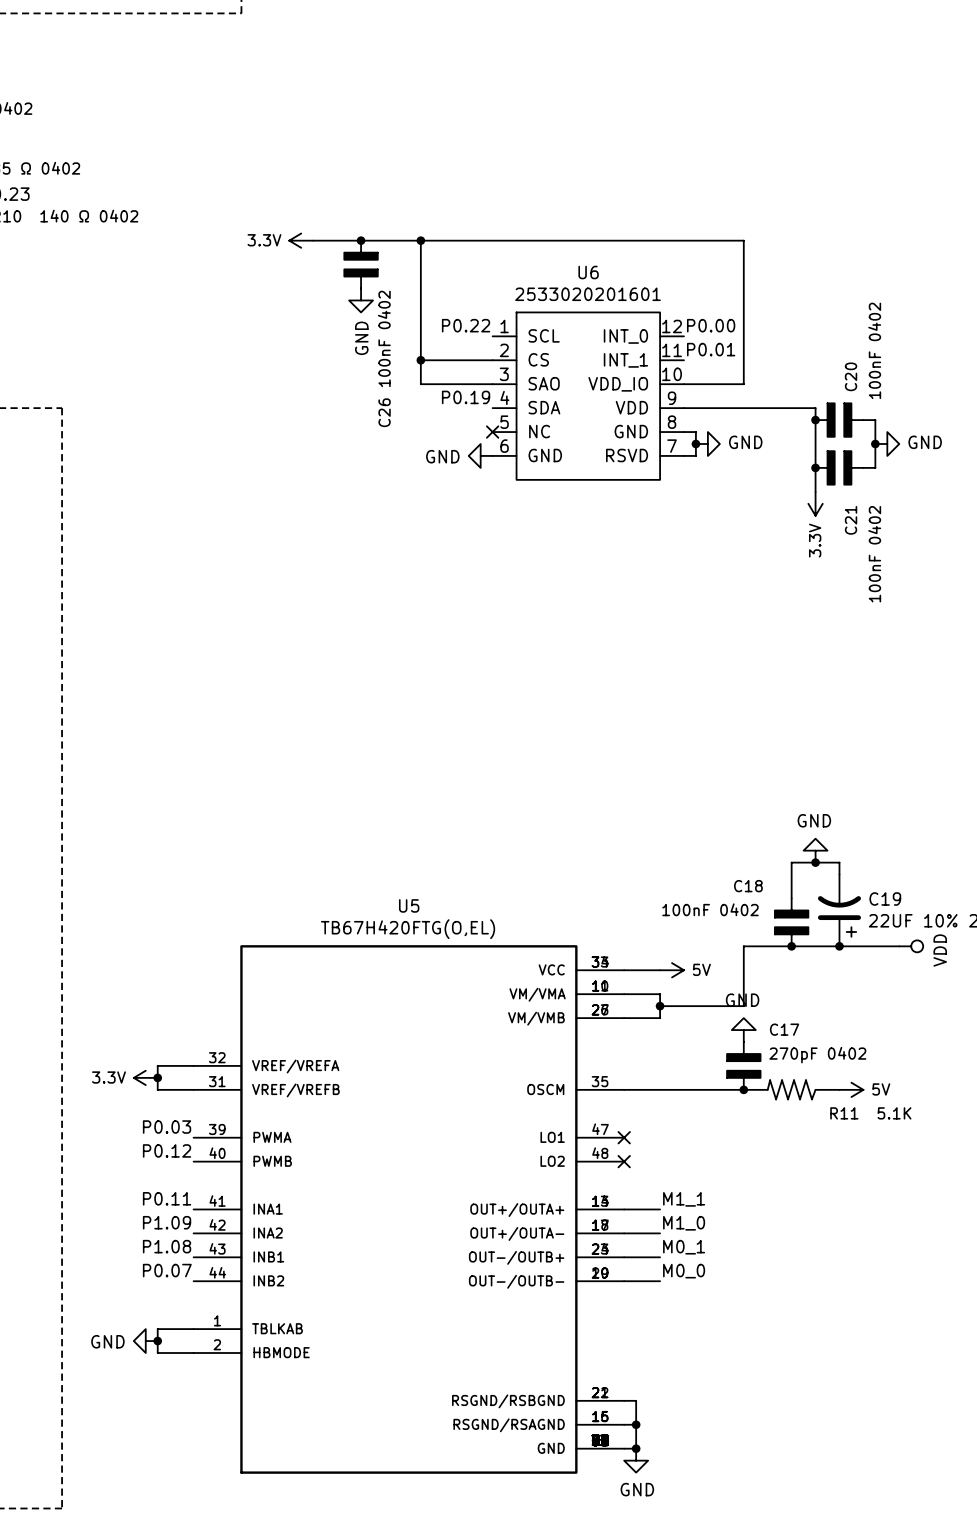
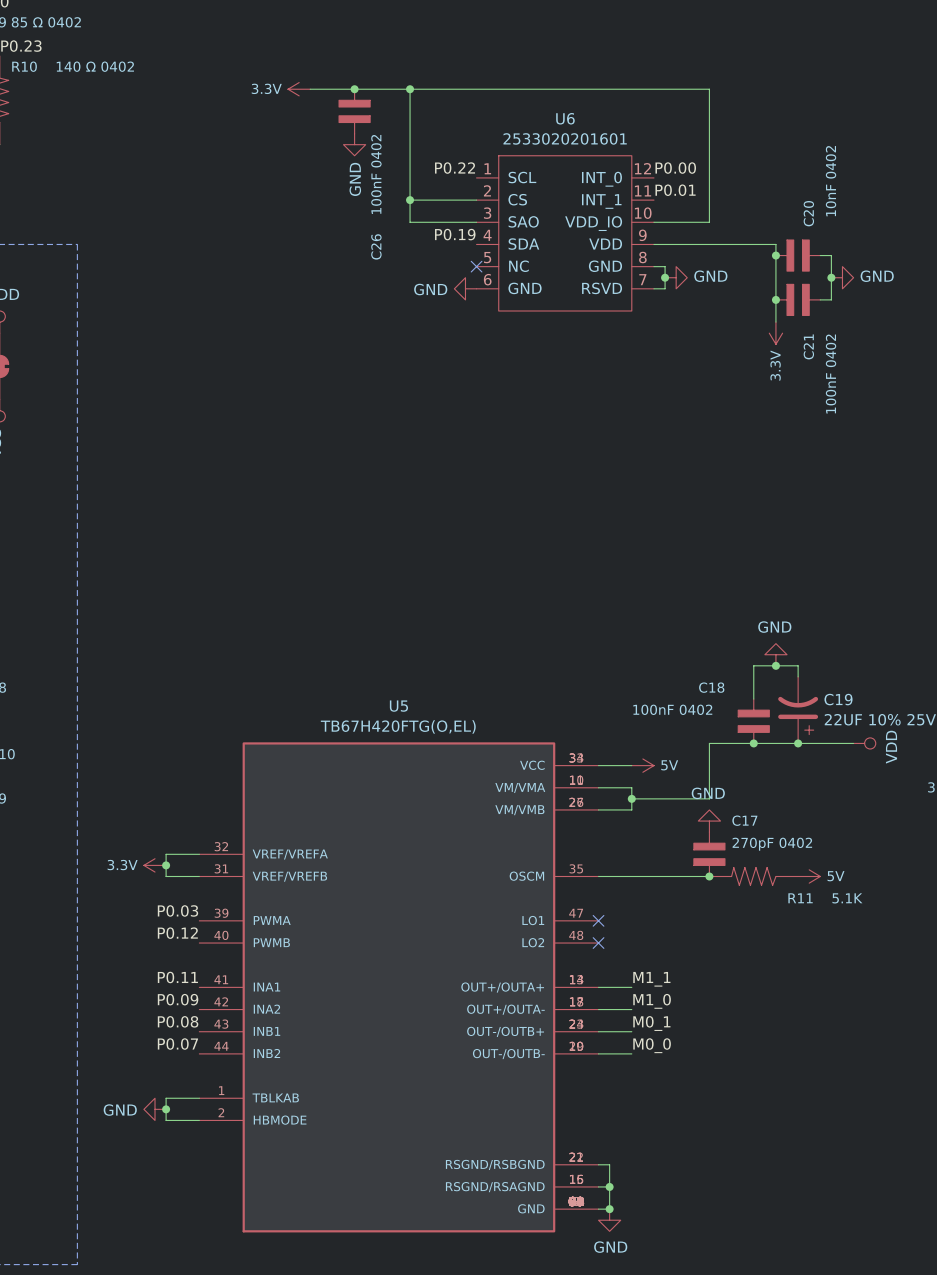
C20 value: 100nF 0402 (874, 350) -> 10nF 0402 (831, 181)
label: P1.09 (167, 1222) -> P0.09 (178, 999)
label: P1.08 (167, 1246) -> P0.08 (178, 1021)

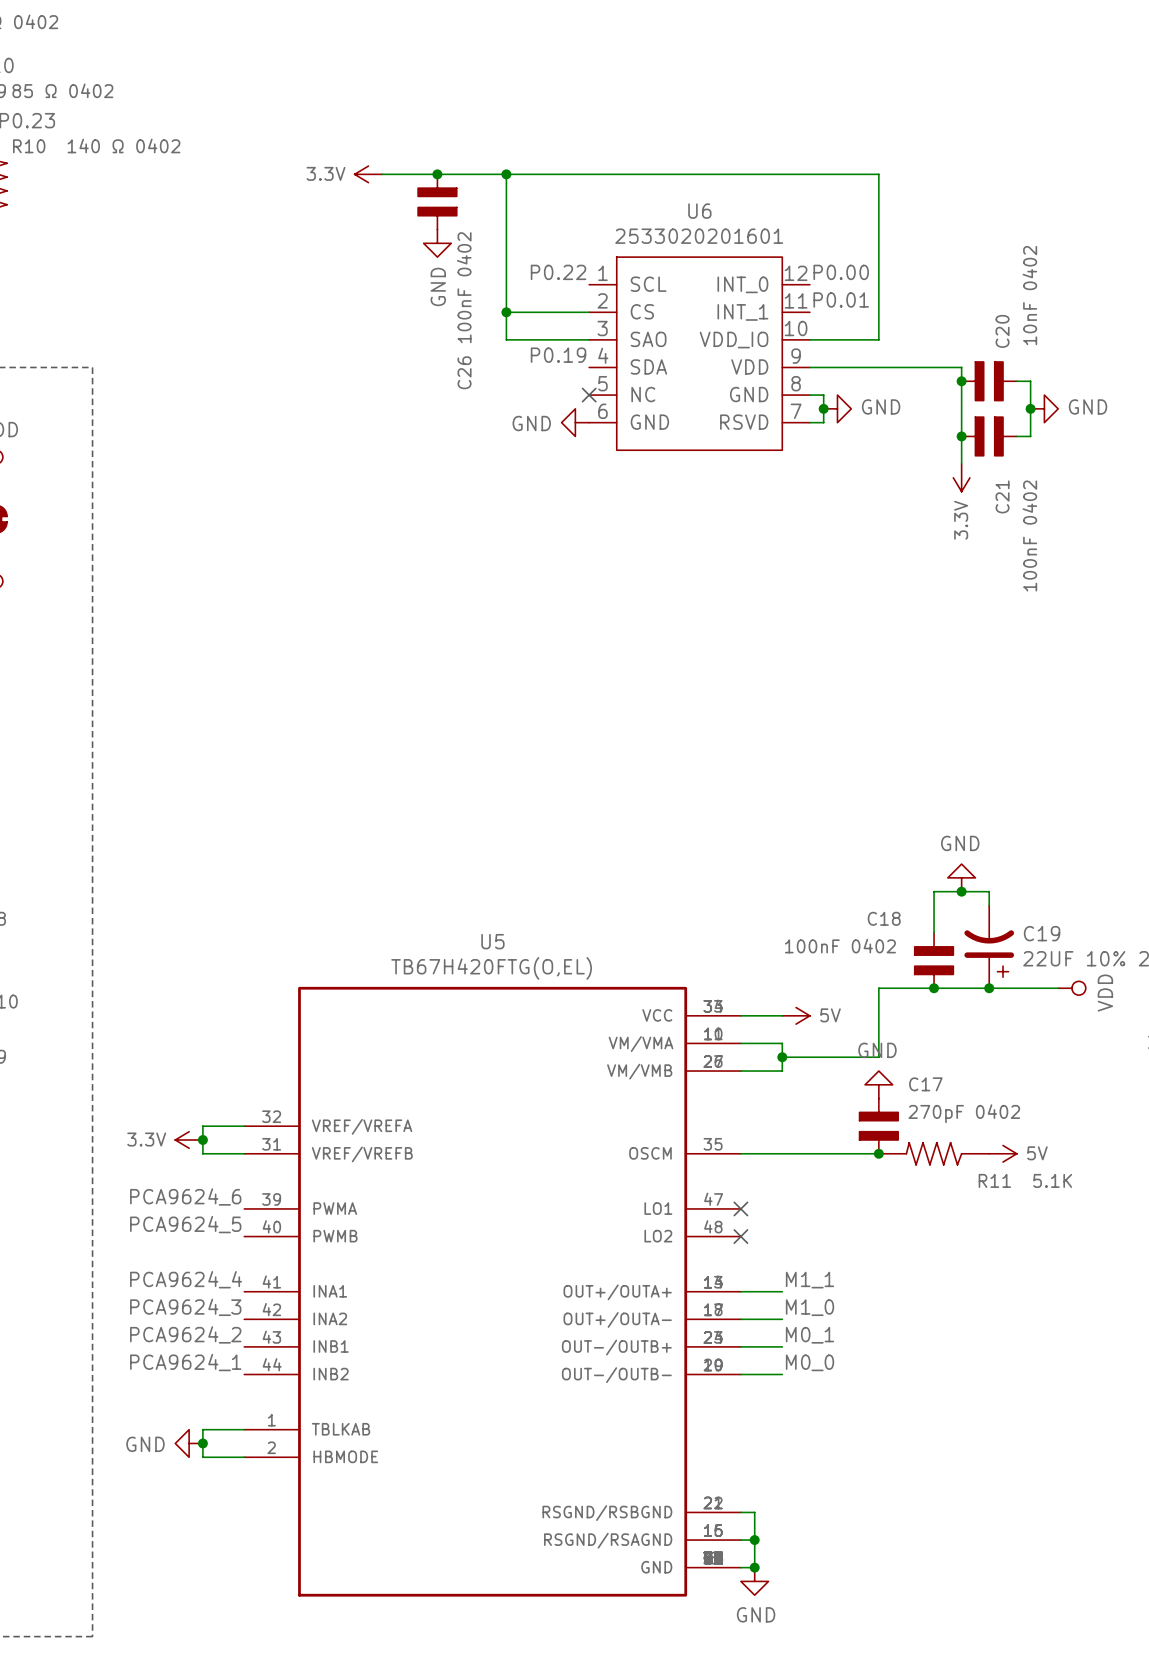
label: P0.03 (177, 910) -> PCA9624_6 (185, 1196)
label: P0.12 (177, 933) -> PCA9624_5 (185, 1224)
label: P0.11 (177, 977) -> PCA9624_4 (186, 1279)
label: P0.09 (178, 999) -> PCA9624_3 (185, 1307)
label: P0.08 (178, 1021) -> PCA9624_2 (185, 1334)
label: P0.07 (177, 1044) -> PCA9624_1 (185, 1362)

